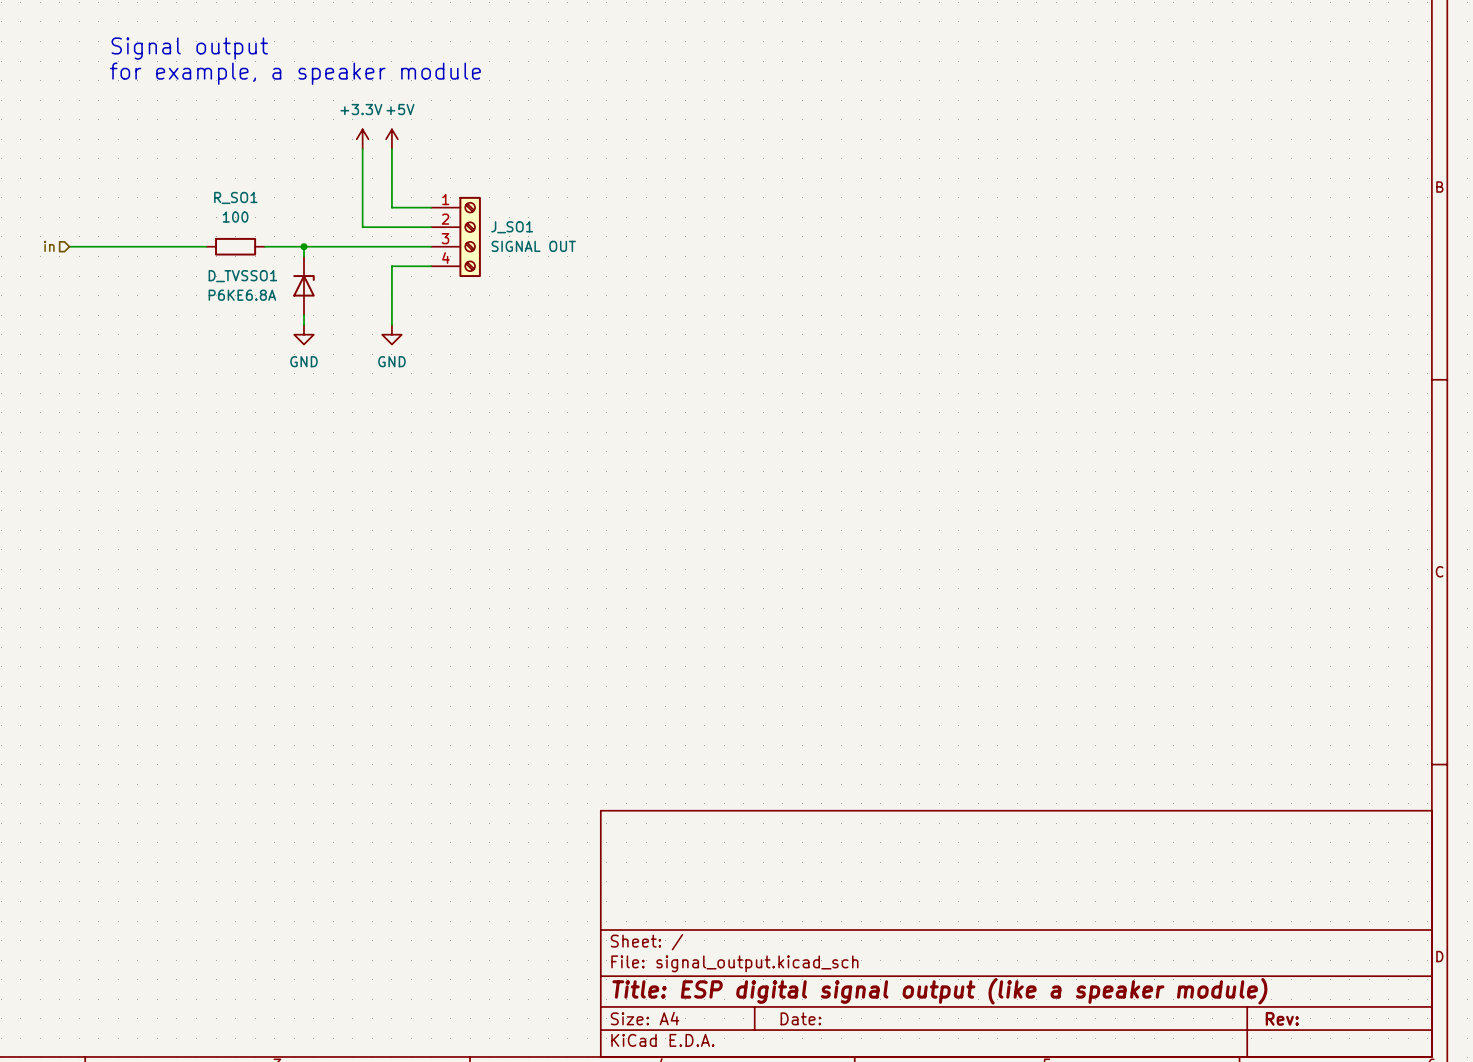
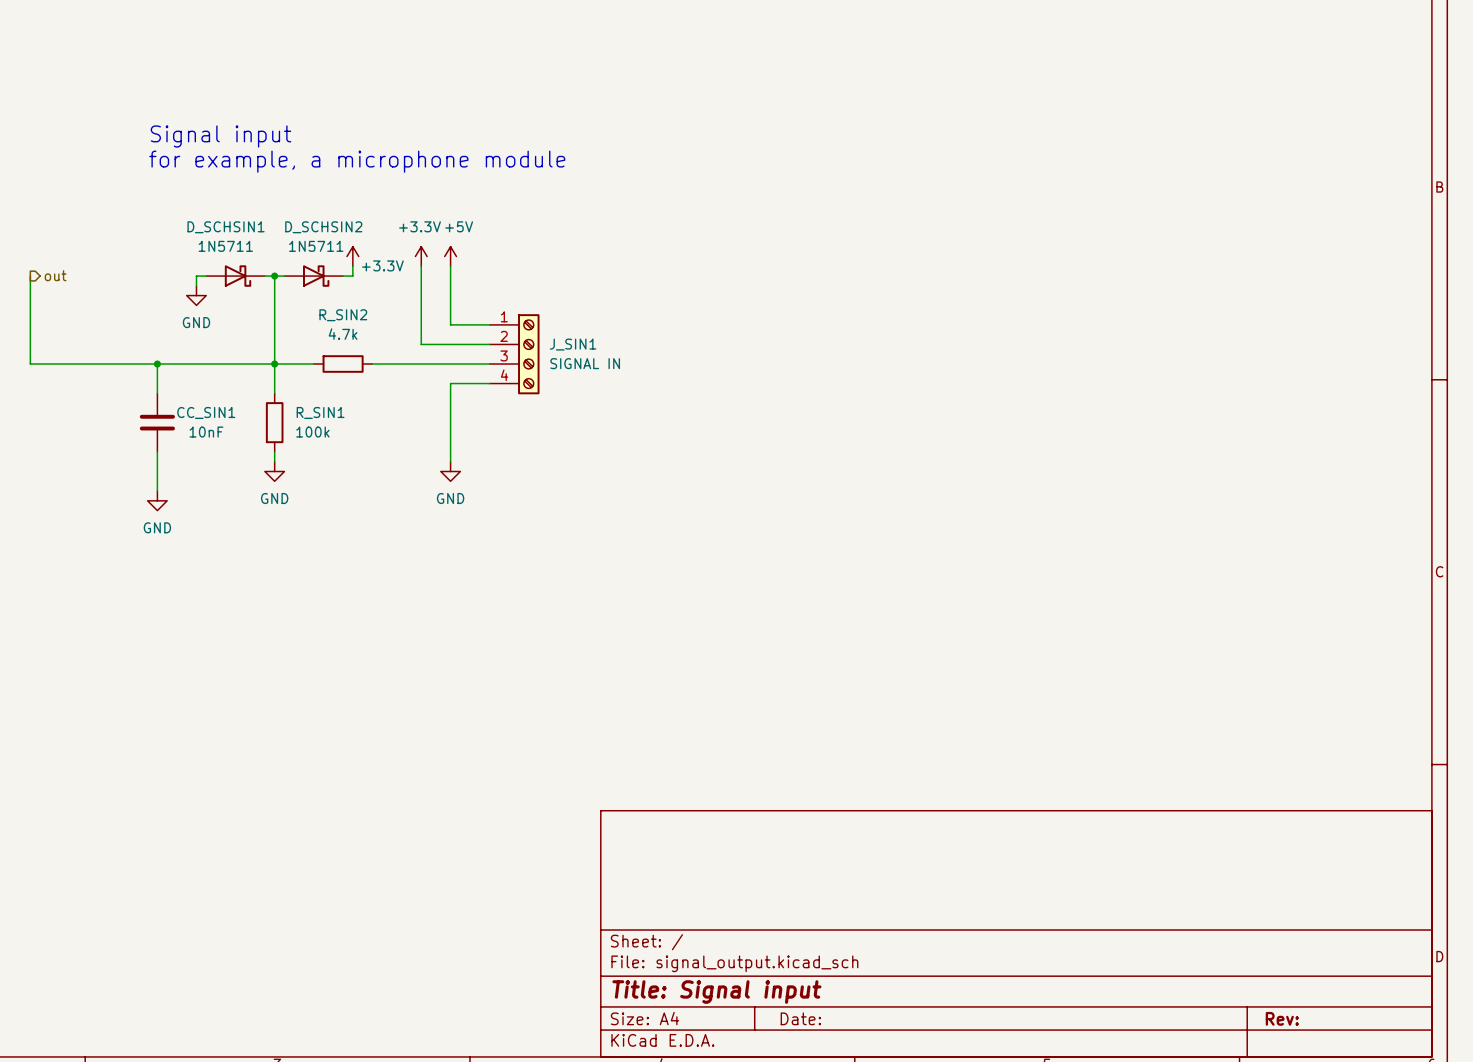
text: Signal output (189, 48) -> none
text: for example, a speaker module (295, 73) -> none
text: none -> Signal input (220, 136)
power symbol: +3.3V (362, 139) -> none
power symbol position: +5V (391, 139) -> +5V (450, 256)
wire: (362, 148) (362, 227) (431, 227) -> (421, 266) (421, 344) (489, 344)
wire: (391, 148) (391, 207) (431, 207) -> (450, 266) (450, 324) (489, 324)
text: none -> for example, a microphone module (357, 161)
J_SO1: SIGNAL OUT (455, 236) -> none
hierarchical label: in (49, 246) -> none
wire: (69, 246) (206, 246) -> none
R_SO1: 100 (235, 246) -> none
wire: (264, 246) (431, 246) -> none
wire: (303, 246) (303, 256) -> none
junction position: (303, 246) -> (274, 276)
power symbol: none -> +3.3V (352, 256)
power symbol: none -> +3.3V (421, 256)
wire: none -> (352, 266) (352, 276) (343, 276)
wire: (431, 266) (391, 266) (391, 324) -> none
hierarchical label: none -> out (55, 275)
wire: none -> (30, 276) (30, 364) (313, 364)
wire: none -> (206, 276) (196, 276) (196, 285)
D_SCHSIN1: none -> 1N5711 (235, 276)
wire: none -> (264, 276) (284, 276)
wire: none -> (274, 276) (274, 393)
D_SCHSIN2: none -> 1N5711 (313, 276)
D_TVSSO1: P6KE6.8A (303, 285) -> none
power symbol: none -> GND (196, 295)
wire: (303, 315) (303, 324) -> (274, 451) (274, 461)
power symbol: GND (303, 334) -> none
power symbol: GND (391, 334) -> none
J_SIN1: none -> SIGNAL IN (514, 354)
wire: none -> (157, 364) (157, 393)
junction: none -> (157, 364)
junction: none -> (274, 364)
R_SIN2: none -> 4.7k (343, 364)
wire: none -> (372, 364) (489, 364)
wire: none -> (489, 383) (450, 383) (450, 461)
CC_SIN1: none -> 10nF (157, 422)
R_SIN1: none -> 100k (274, 422)
wire: none -> (157, 451) (157, 491)
power symbol: none -> GND (274, 471)
power symbol: none -> GND (450, 471)
power symbol: none -> GND (157, 500)
title block: Title: ESP digital signal output (like a speaker module) (939, 991) -> Title: Signal input (716, 992)

